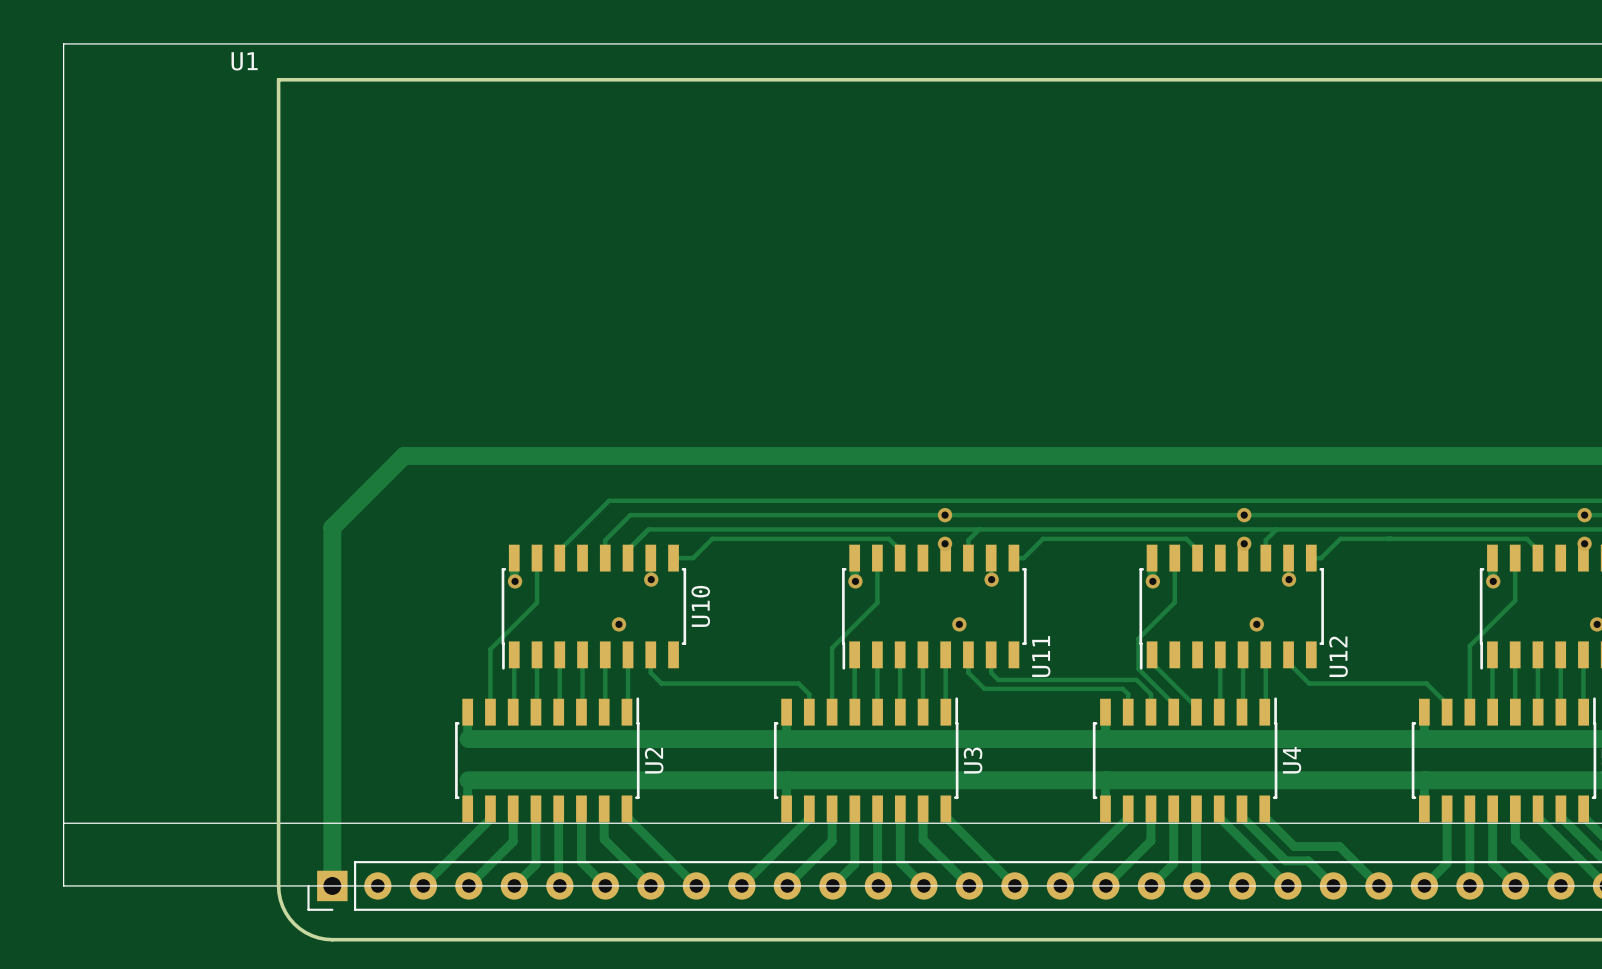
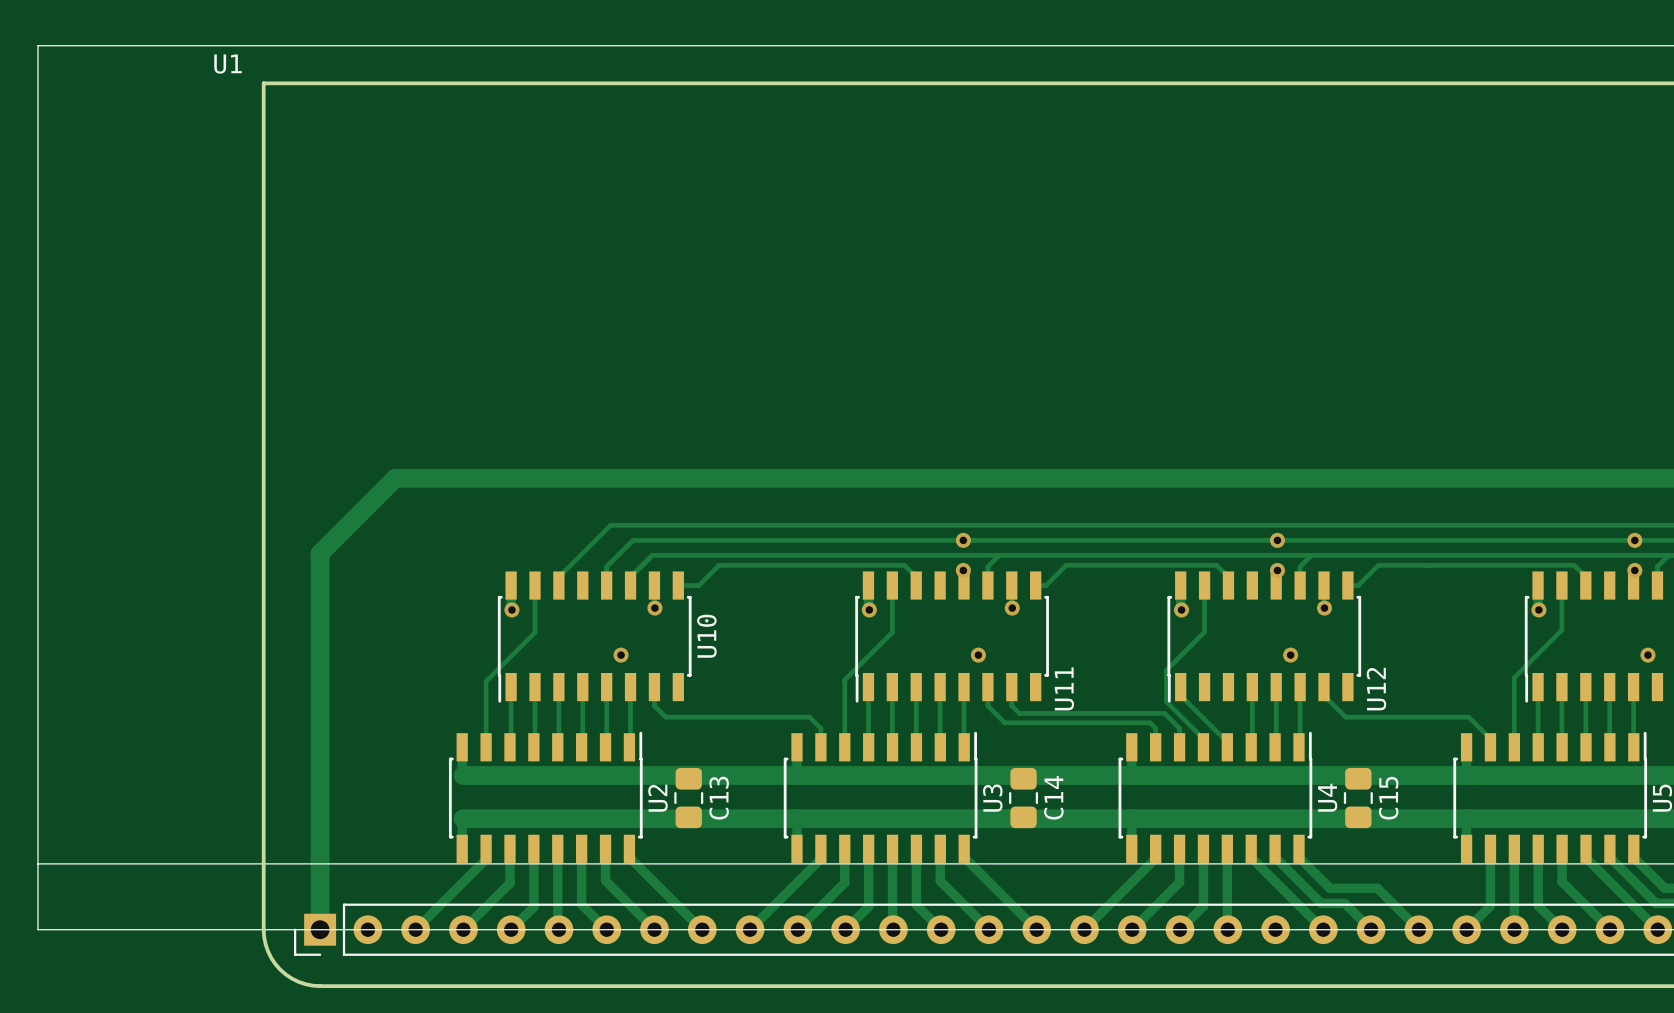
C13: none -> (688, 798)
C14: none -> (1023, 798)
C15: none -> (1358, 798)

